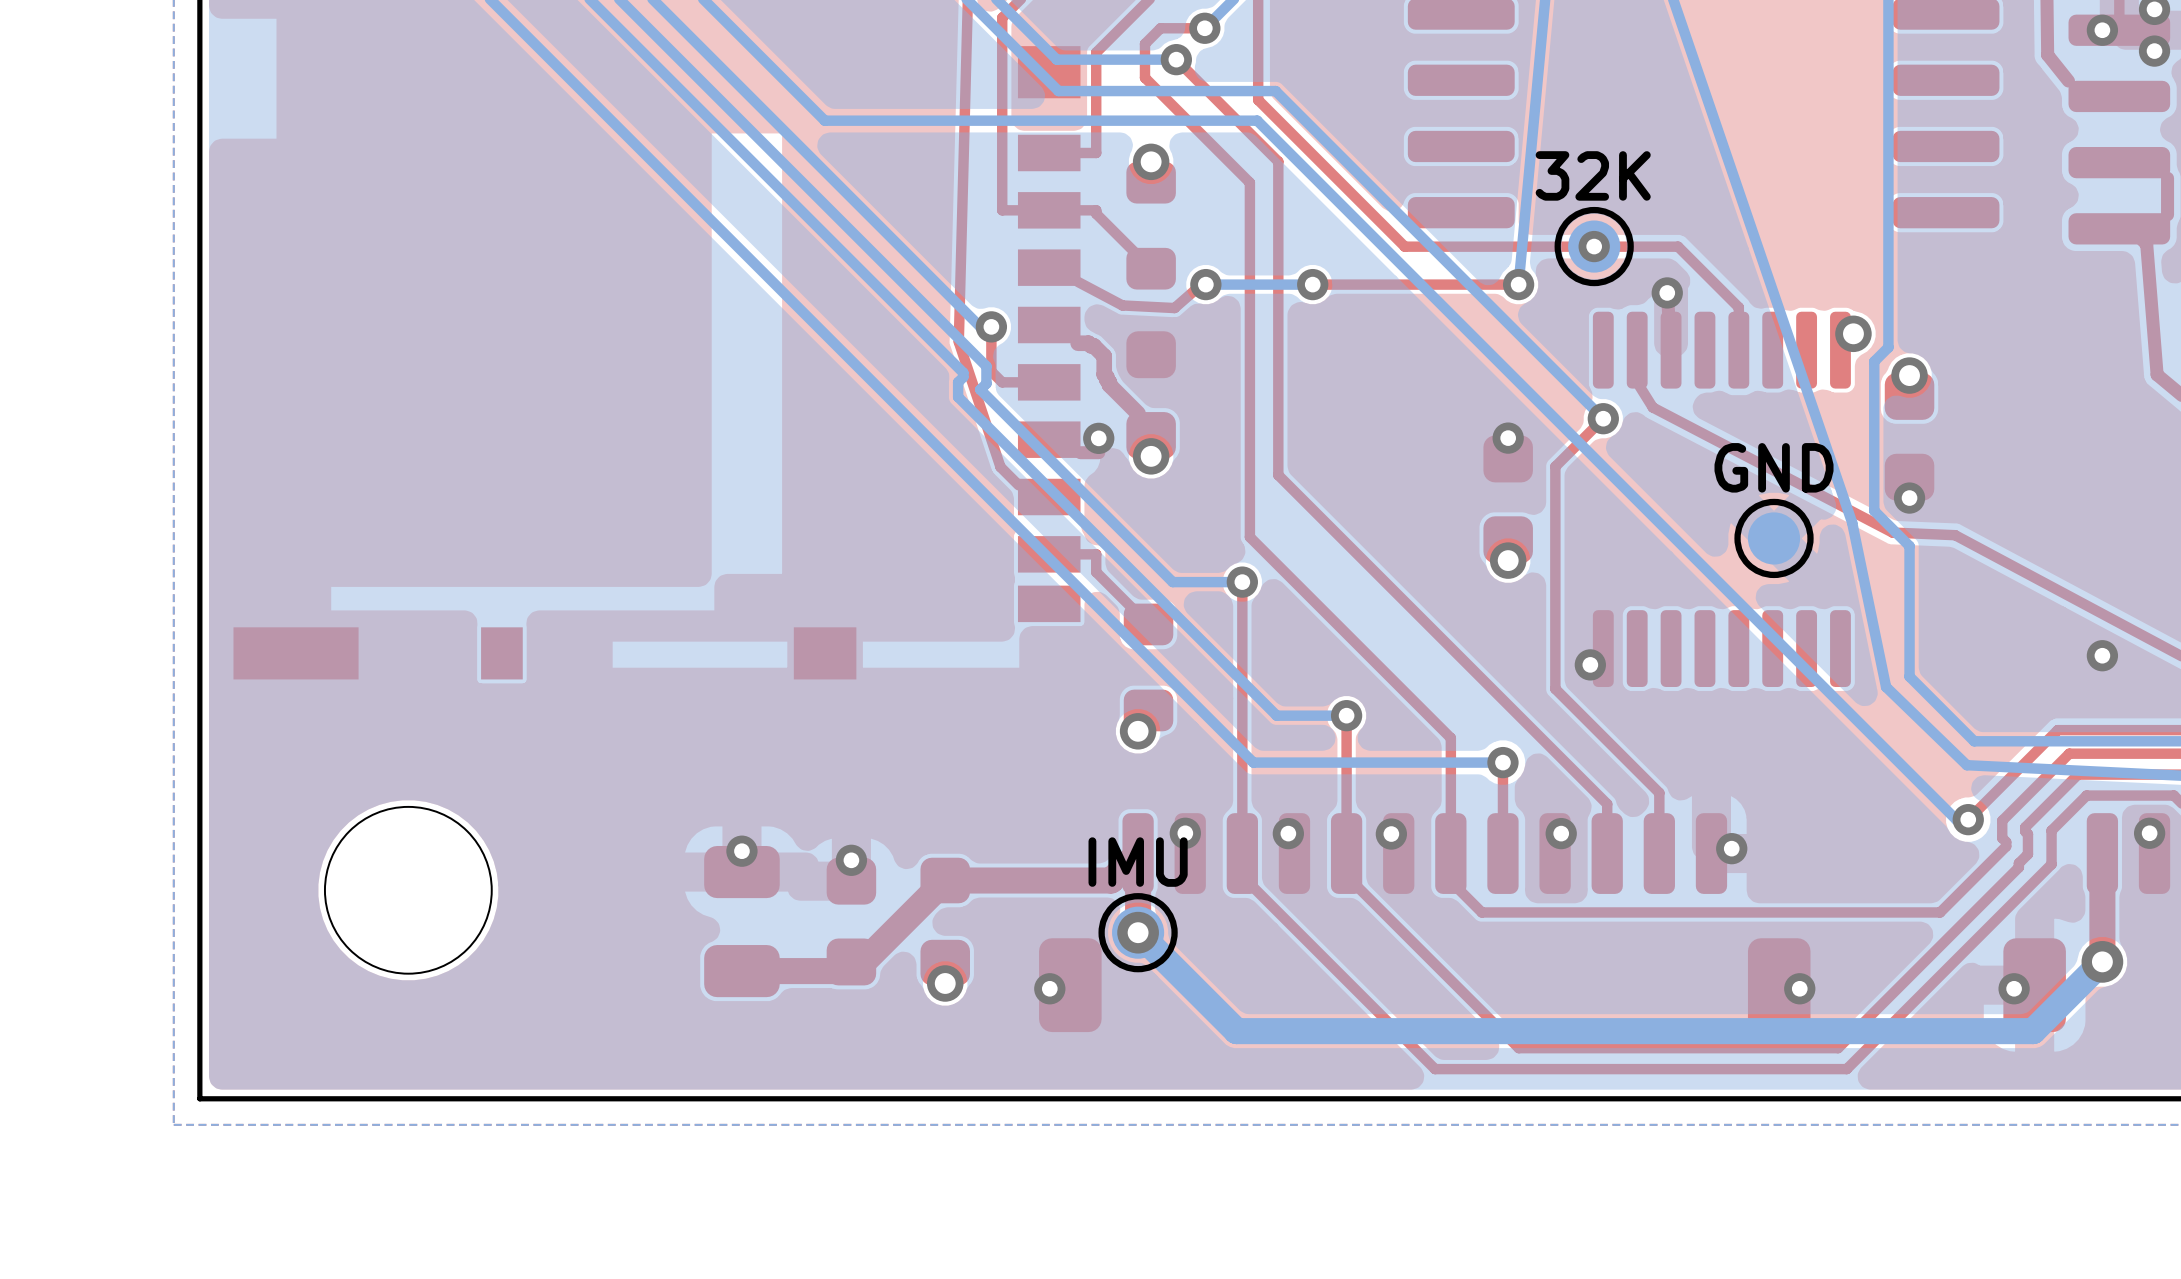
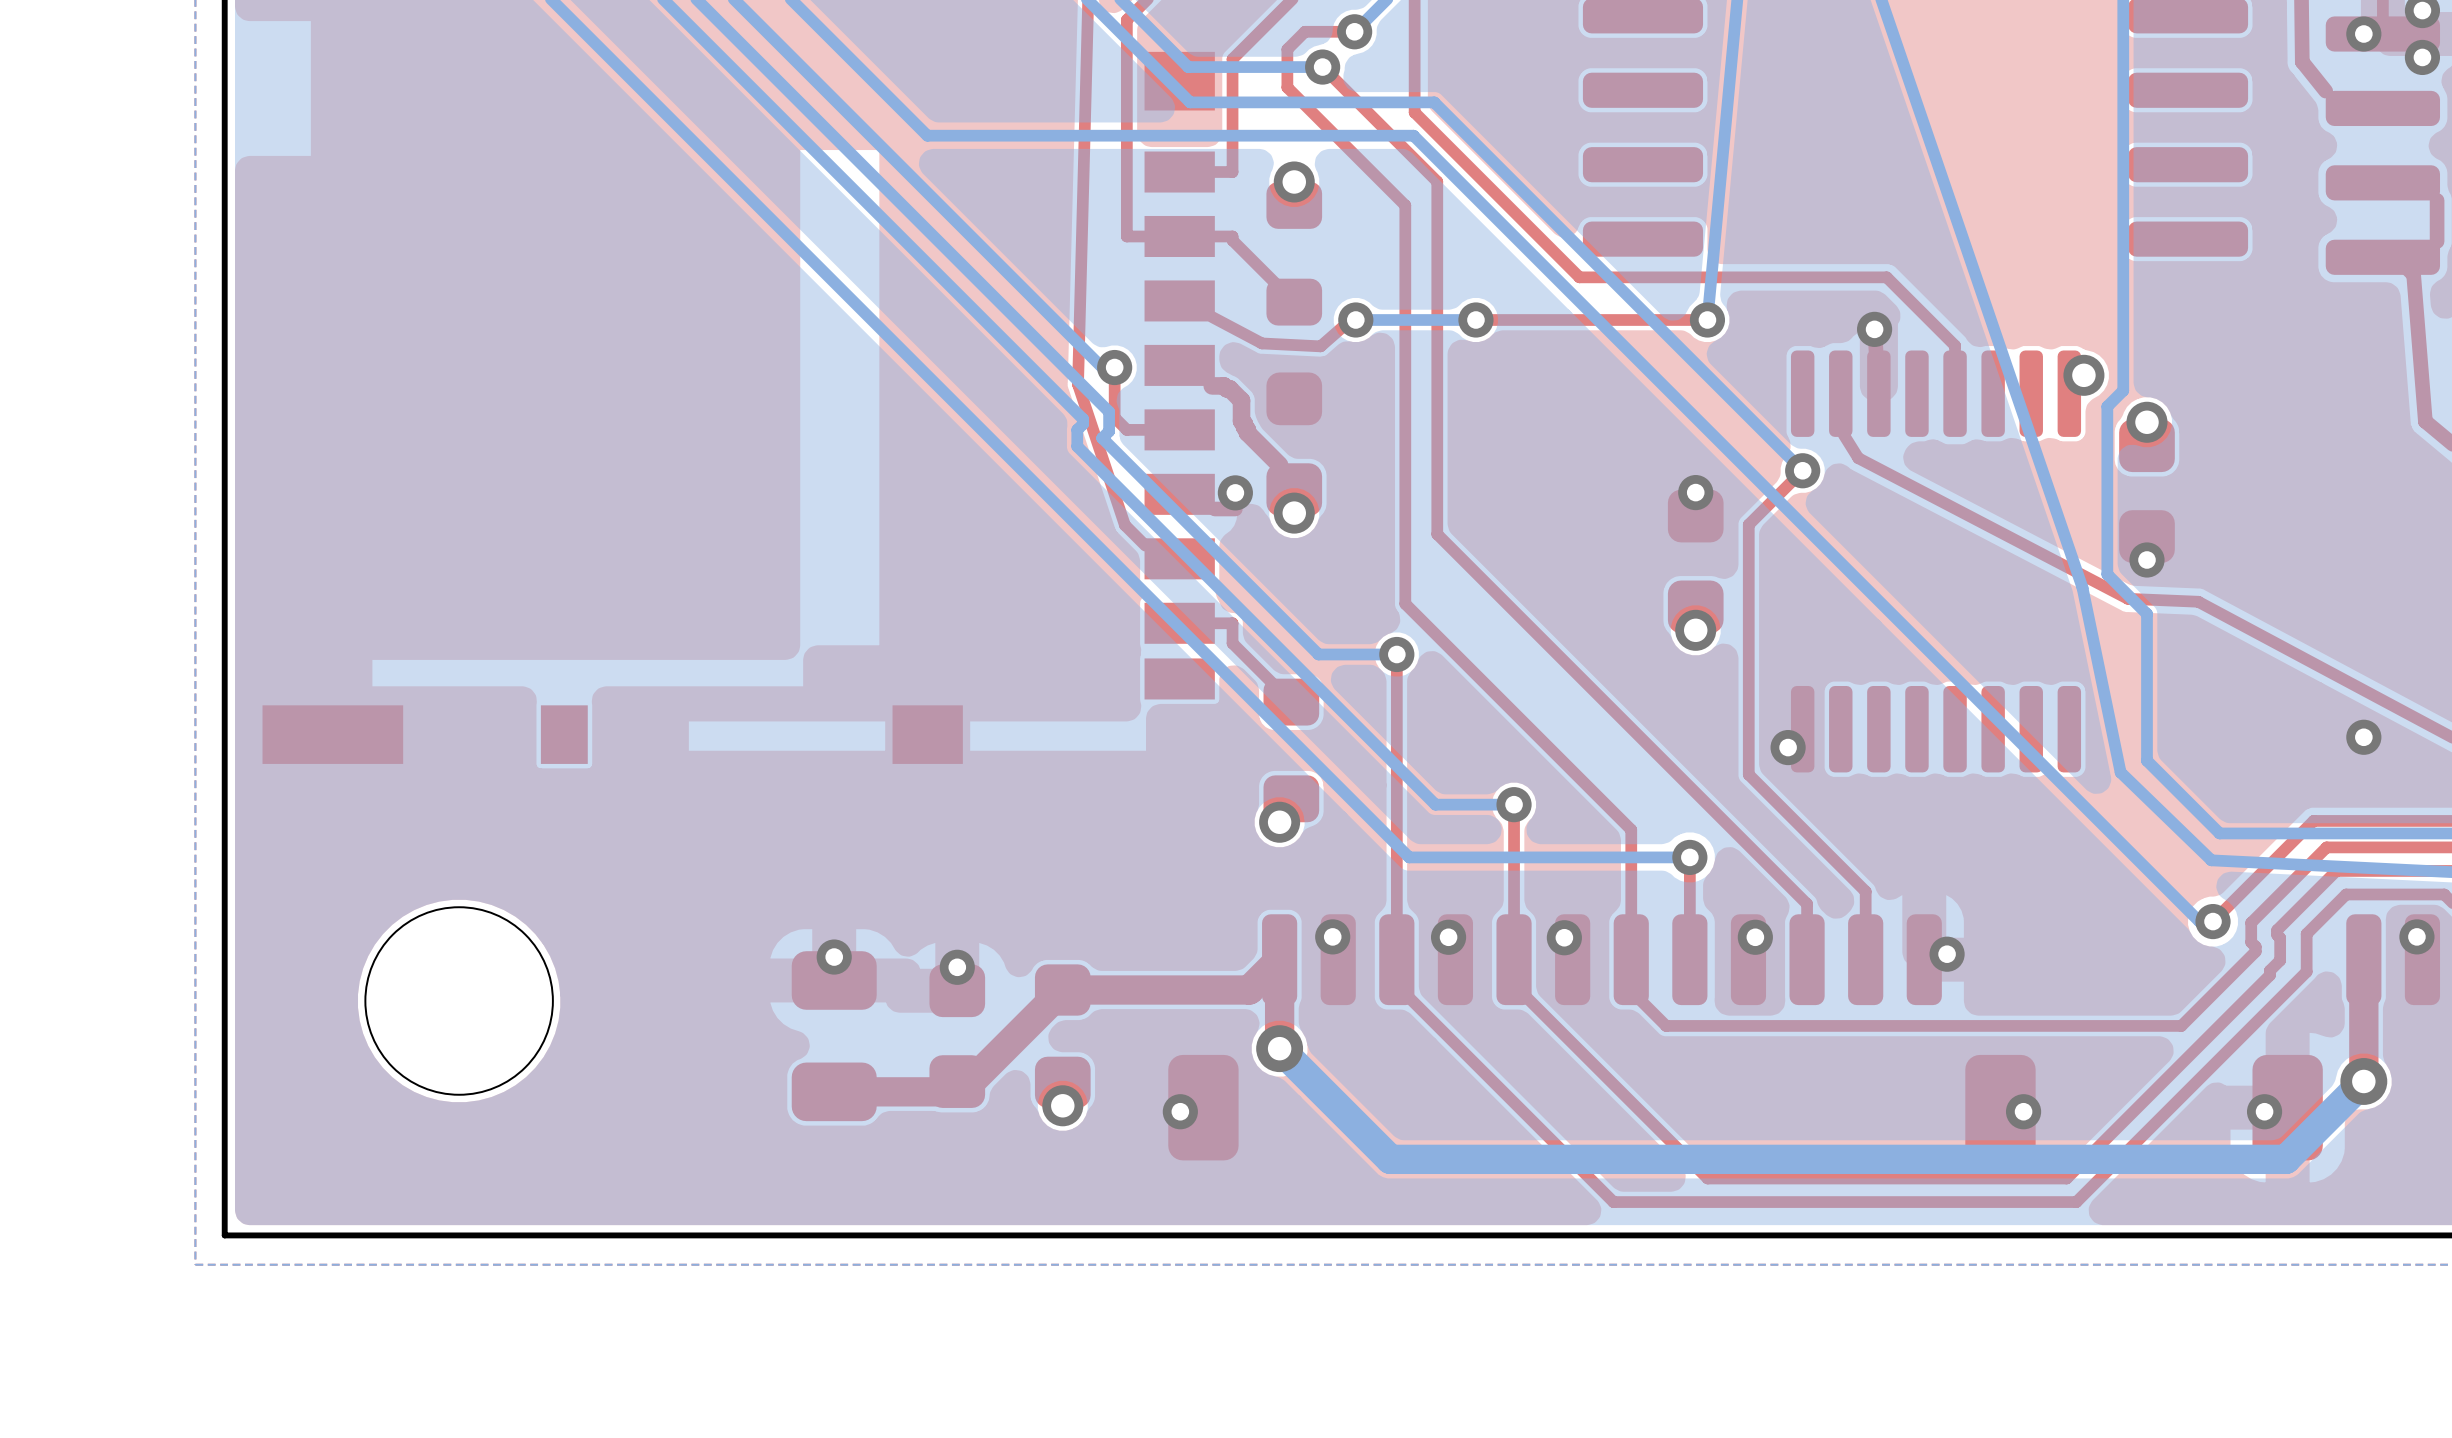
part: 32K (1594, 246) -> none
via: (1594, 246) -> none
part: GND (1774, 538) -> none
part: IMU (1138, 932) -> none

